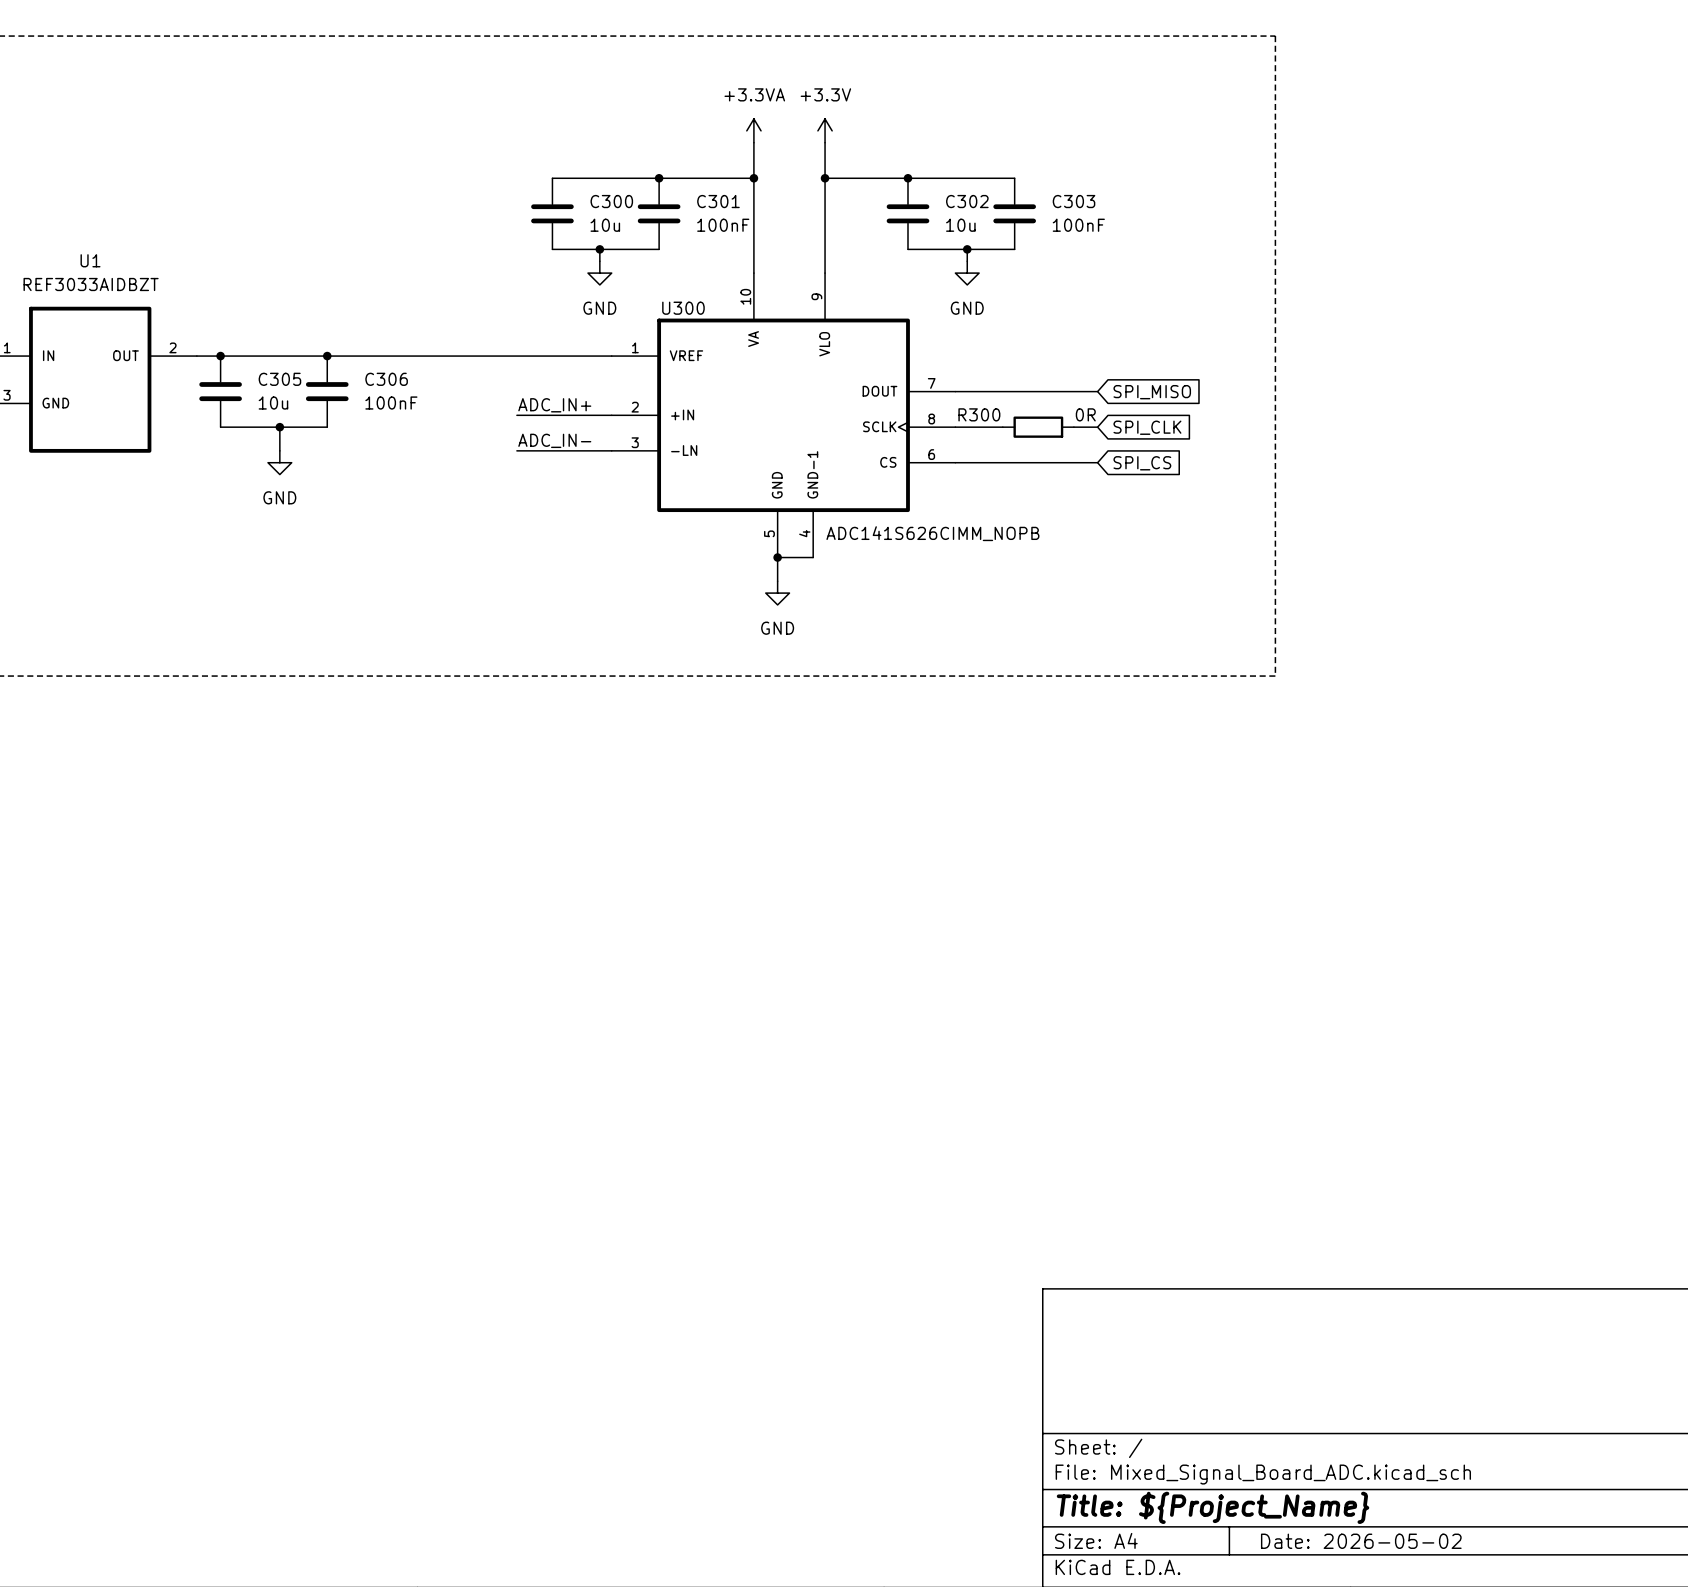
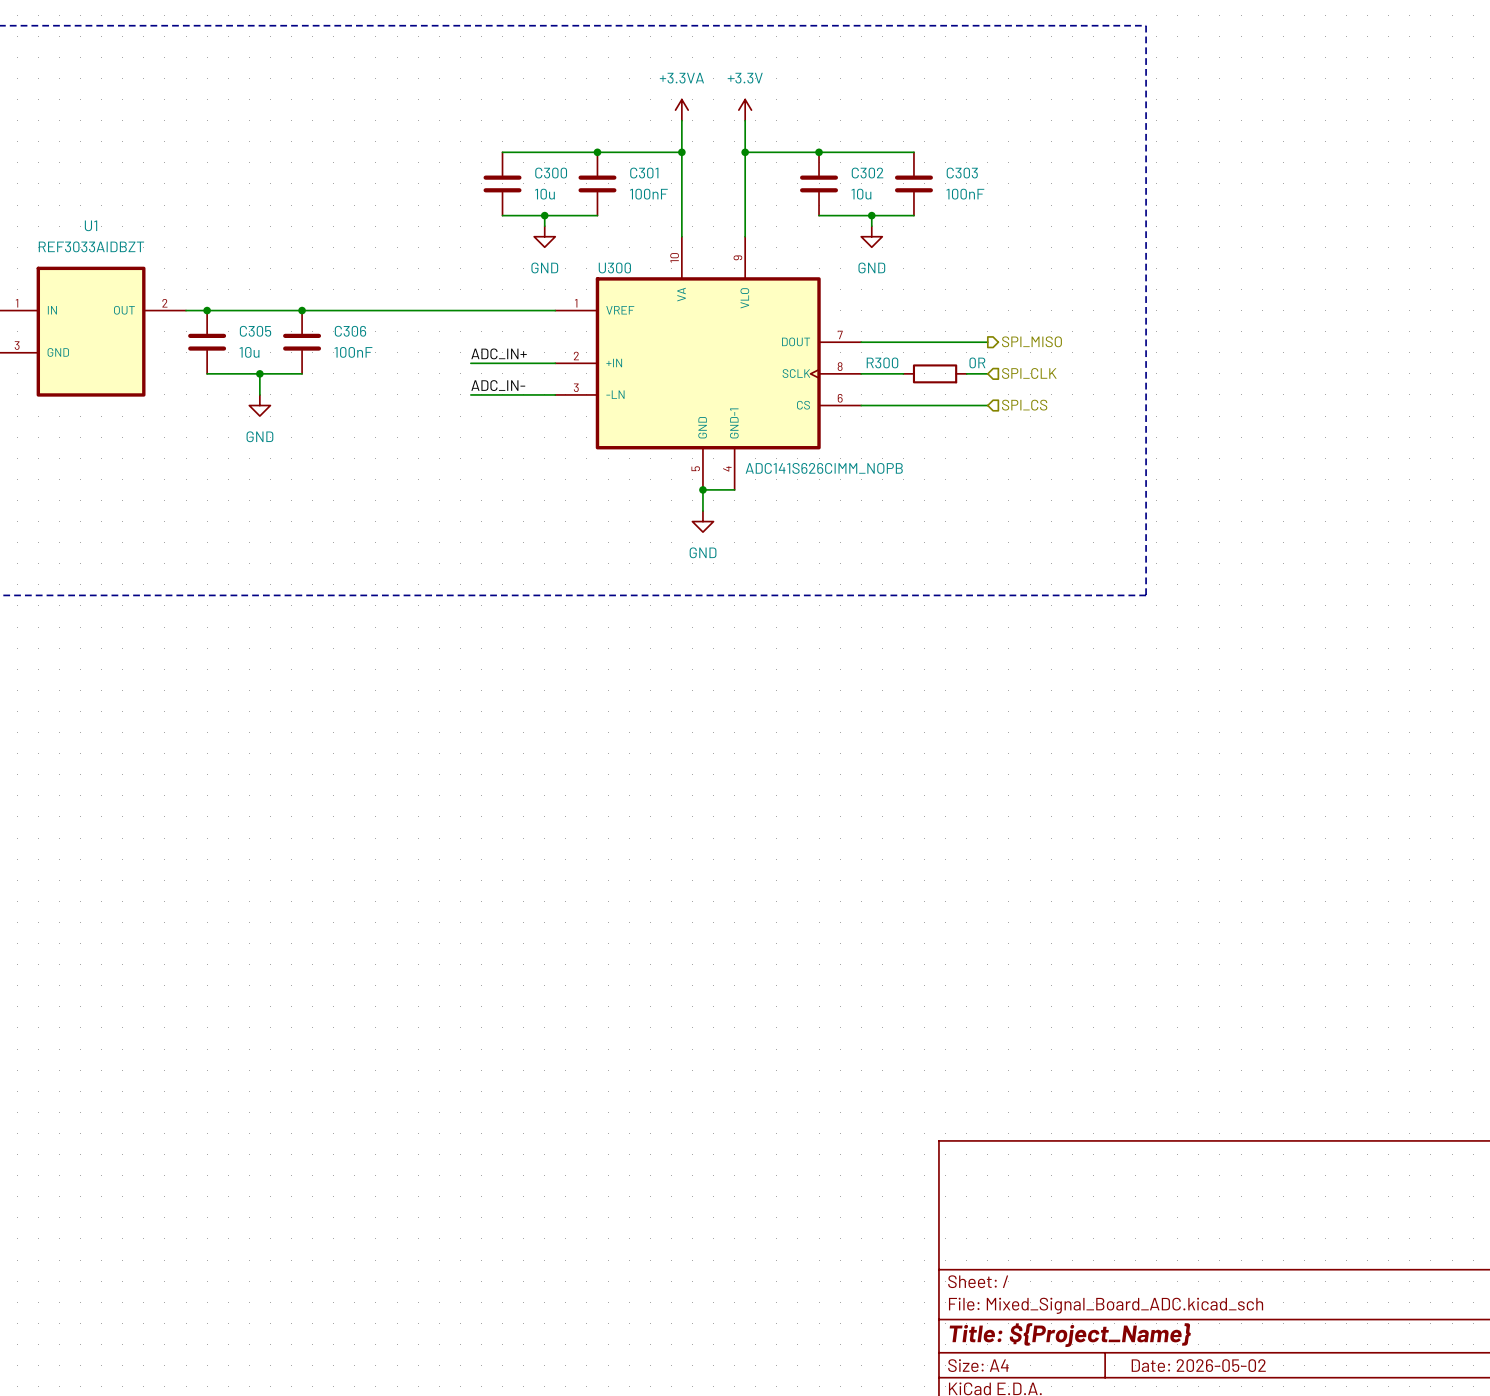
hierarchical label: none -> SPI_MISO (1031, 341)
global label: SPI_MISO (1152, 392) -> none
global label: SPI_CLK (1147, 427) -> none
hierarchical label: none -> SPI_CLK (1029, 373)
hierarchical label: none -> SPI_CS (1024, 405)
global label: SPI_CS (1142, 463) -> none

